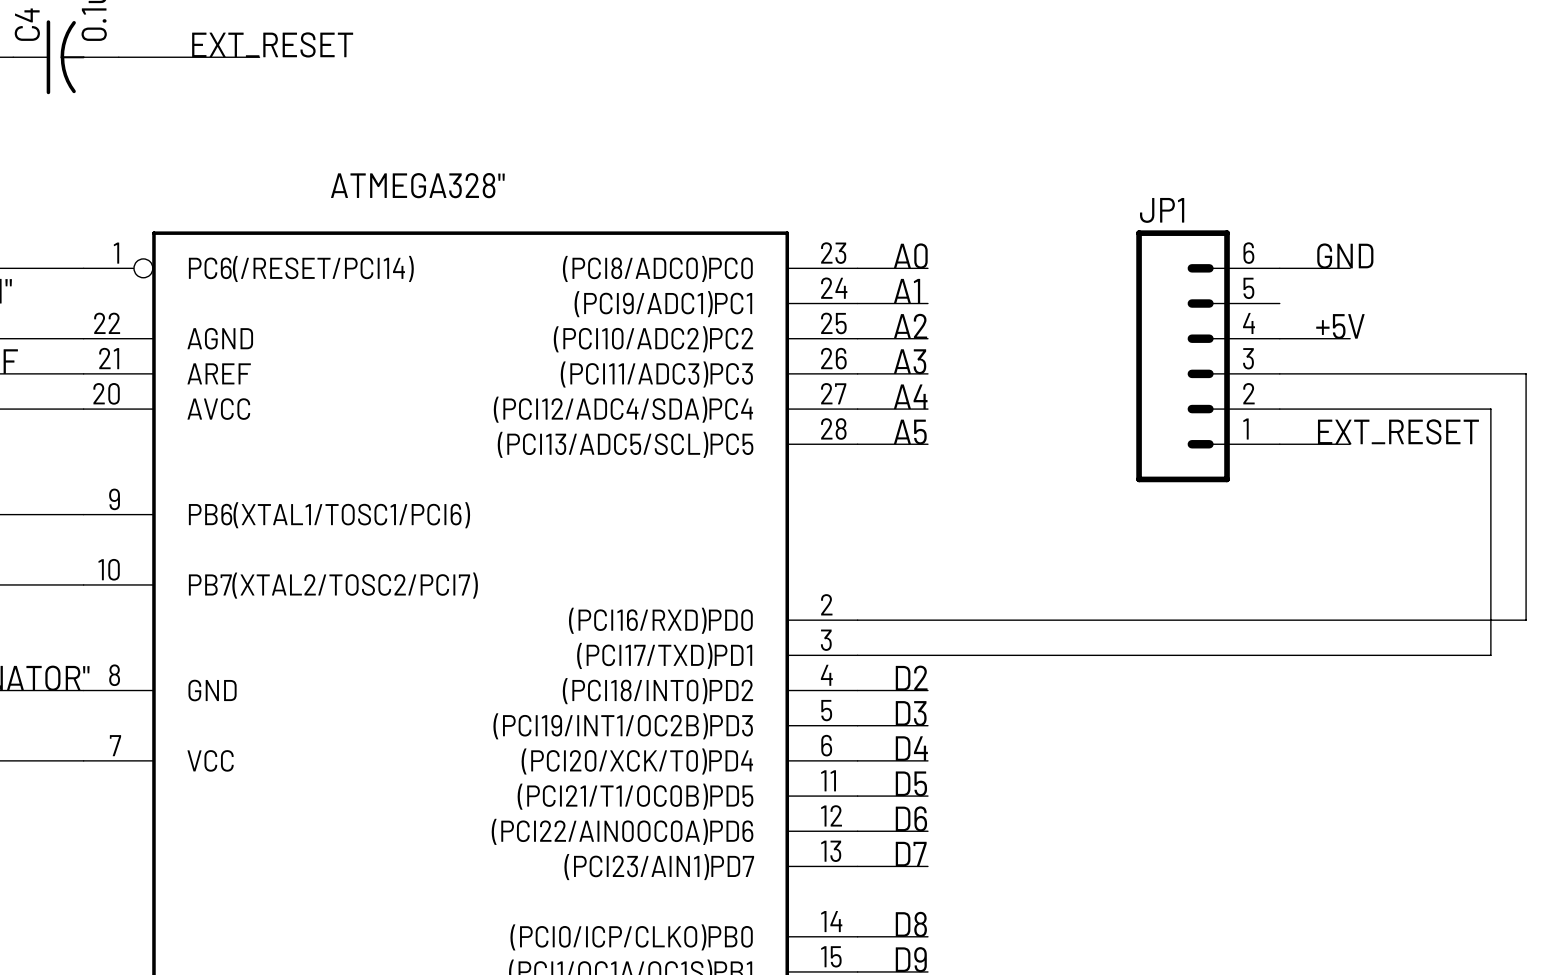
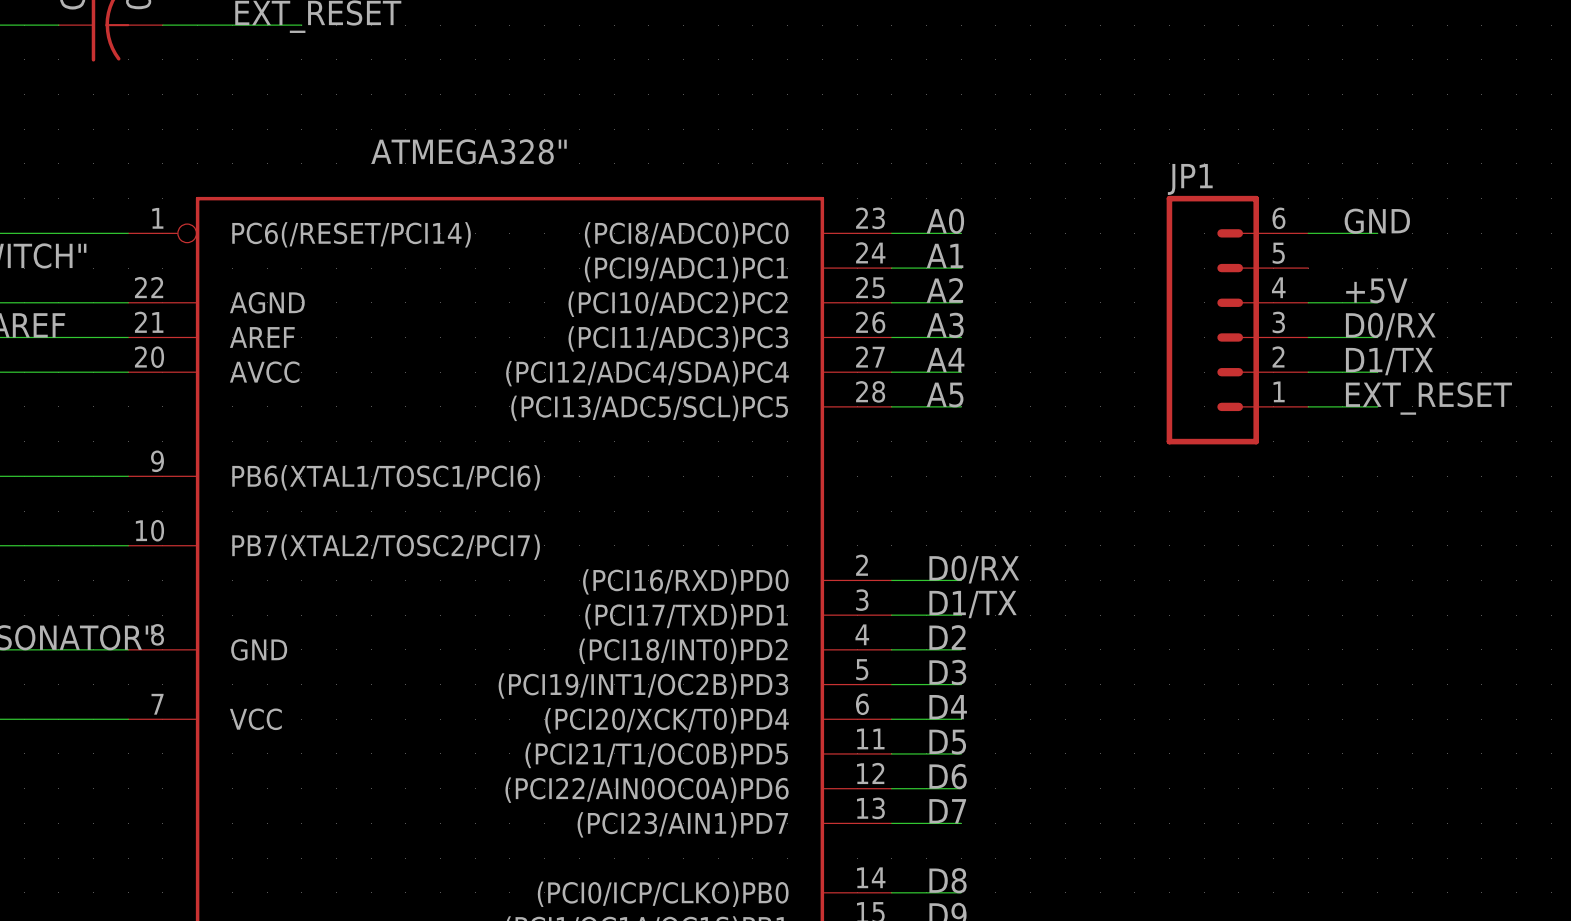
label: none -> D0/RX (1390, 326)
wire: (1350, 373) (1526, 373) (1526, 620) (927, 620) -> none
label: none -> D1/TX (1389, 361)
wire: (1350, 409) (1490, 409) (1490, 655) (927, 655) -> none
label: none -> D0/RX (974, 569)
label: none -> D1/TX (973, 604)

